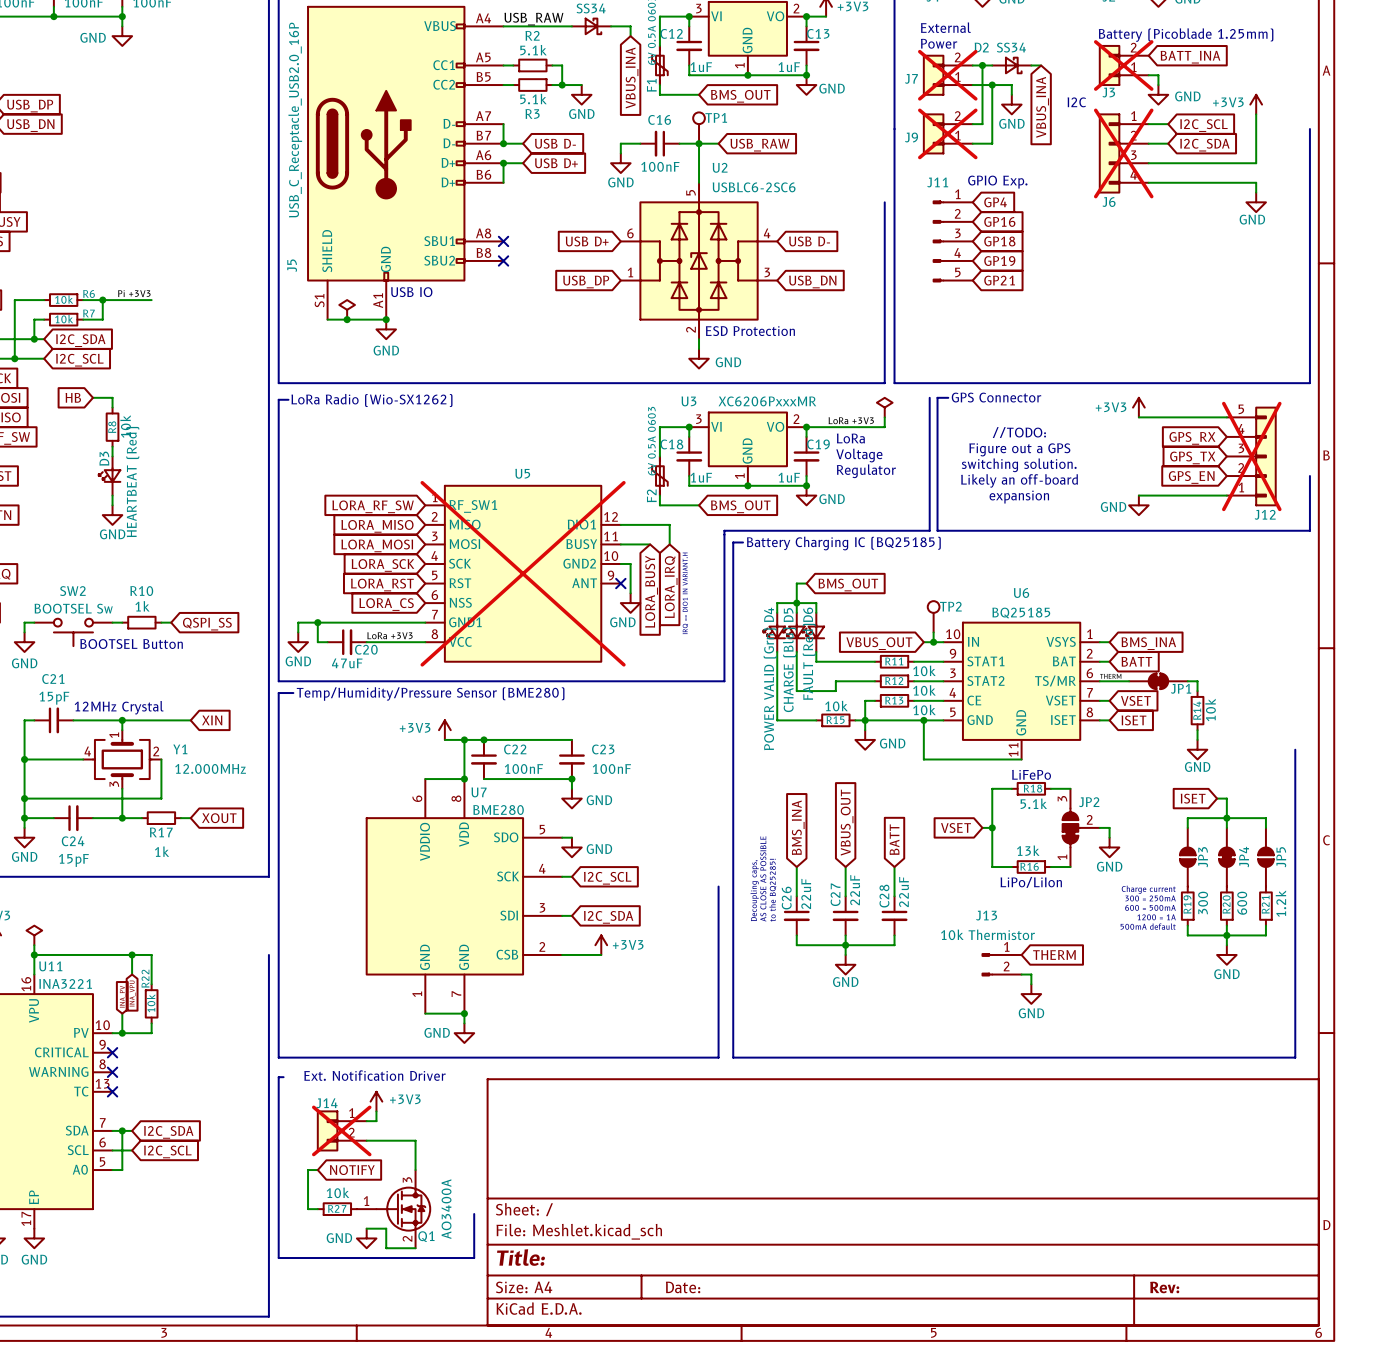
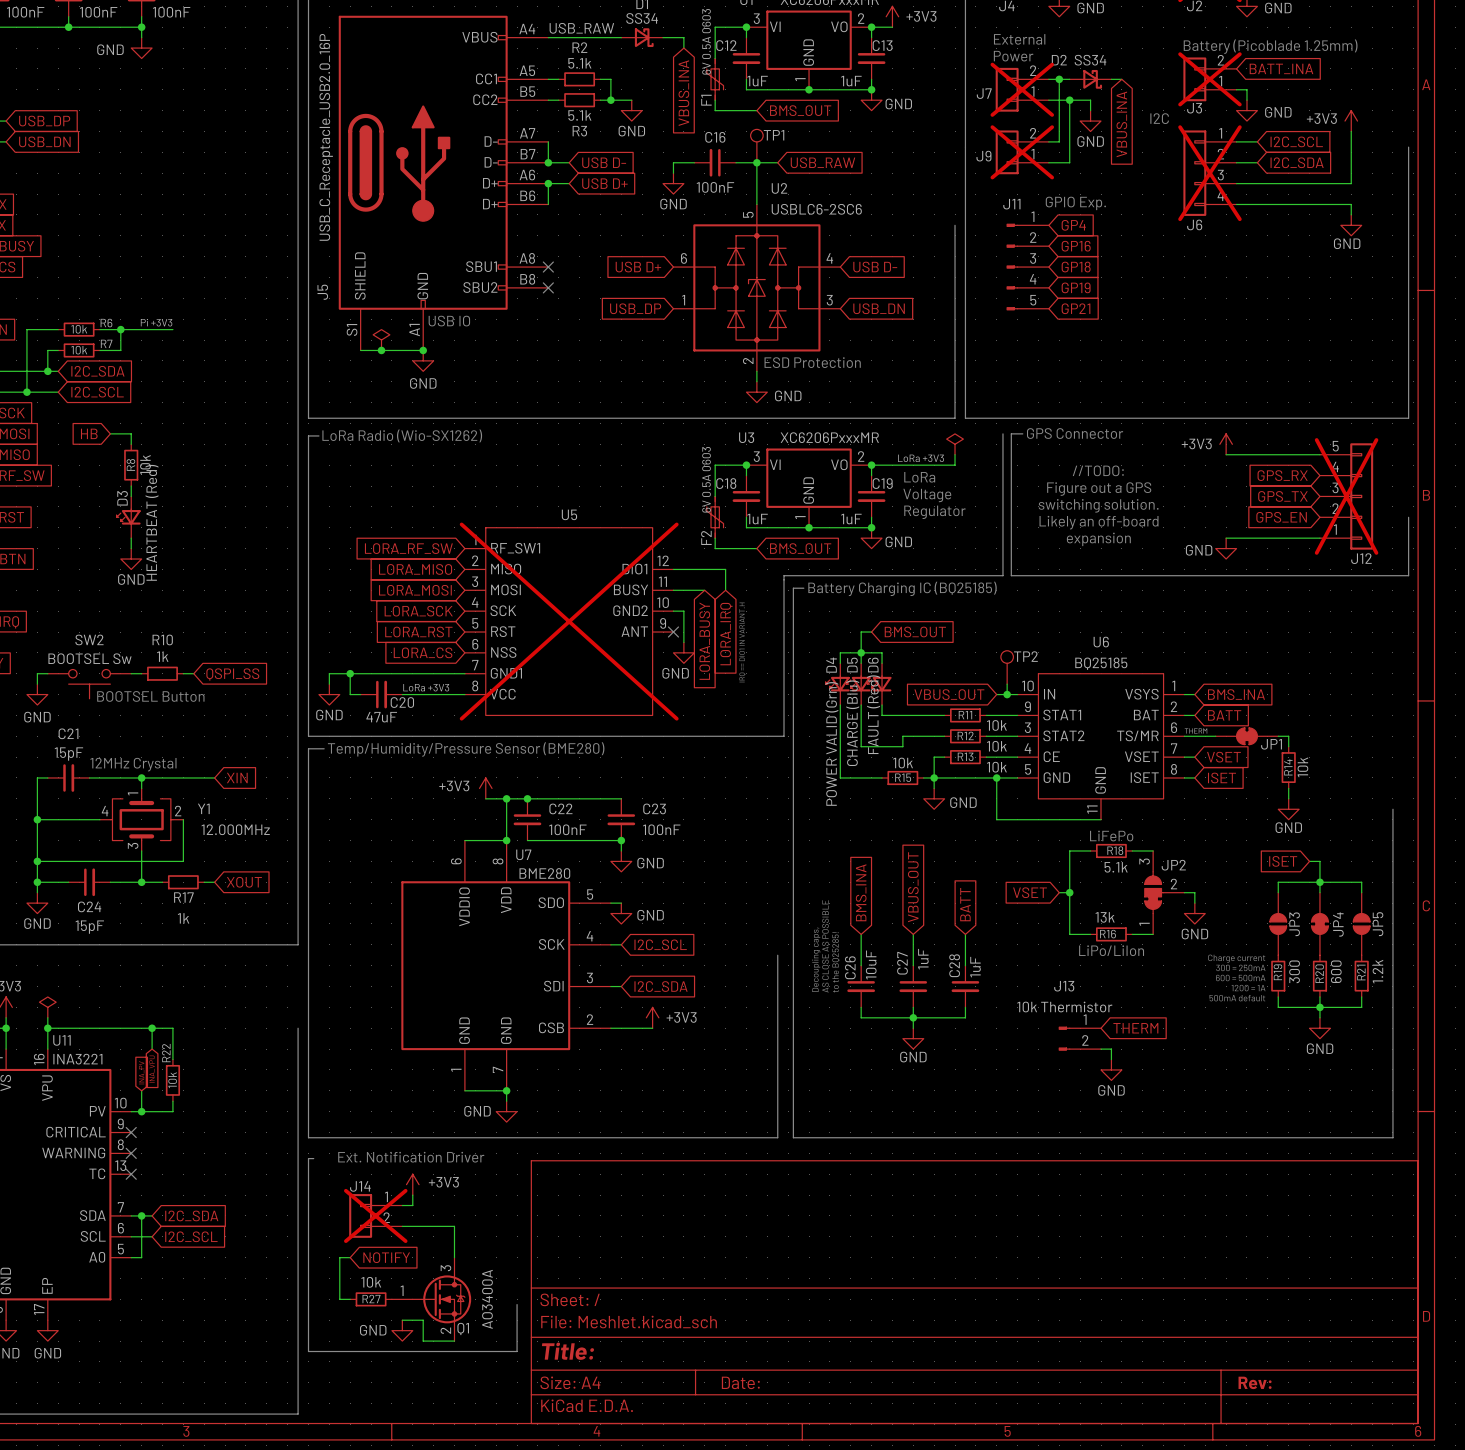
C27 value: 22uF (855, 890) -> 1uF (923, 959)
C28 value: 22uF (903, 892) -> 1uF (975, 967)
C26 value: 22uF (806, 893) -> 10uF (871, 964)

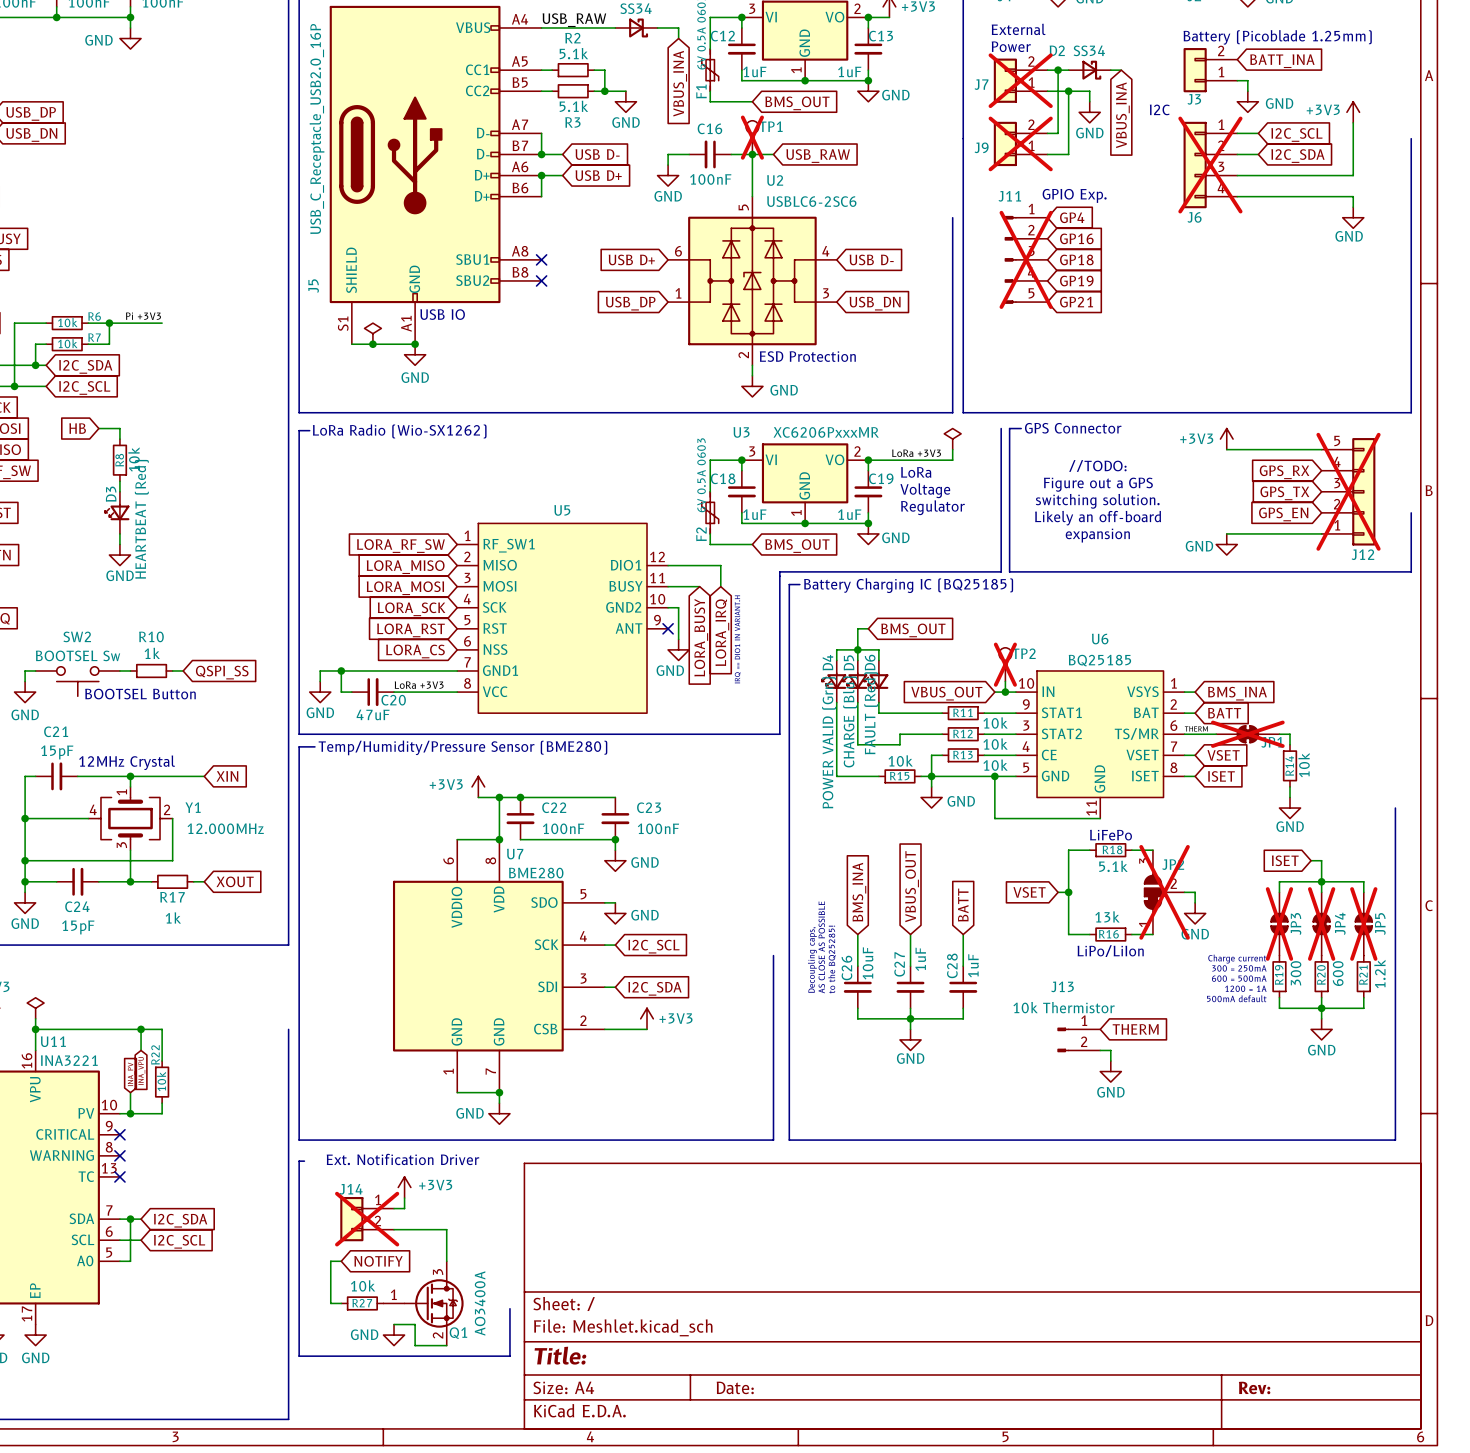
J3 do-not-place cross: (1209, 79) -> none
TP1 do-not-place cross: none -> (752, 137)
J11 do-not-place cross: none -> (1026, 259)
U5 do-not-place cross: (569, 621) -> none
TP2 do-not-place cross: none -> (1005, 664)
JP1 do-not-place cross: none -> (1247, 734)
JP2 do-not-place cross: none -> (1164, 892)
JP3 do-not-place cross: none -> (1279, 923)
JP4 do-not-place cross: none -> (1321, 923)
JP5 do-not-place cross: none -> (1363, 923)

